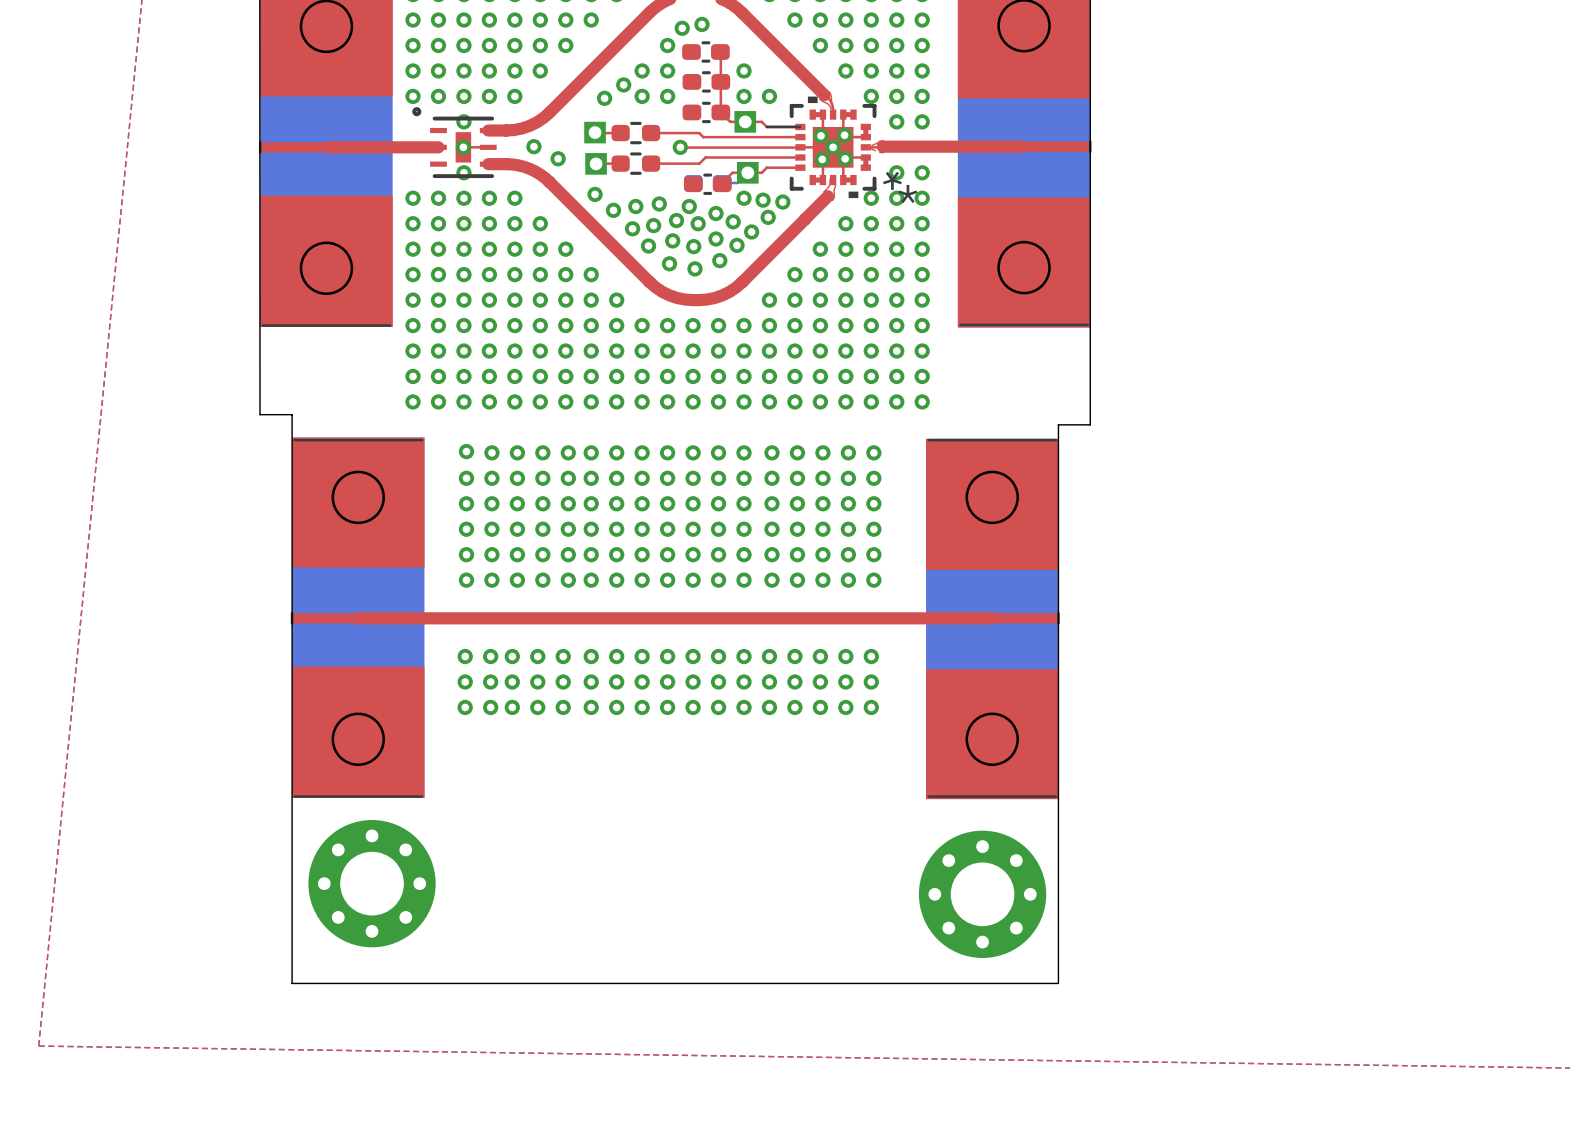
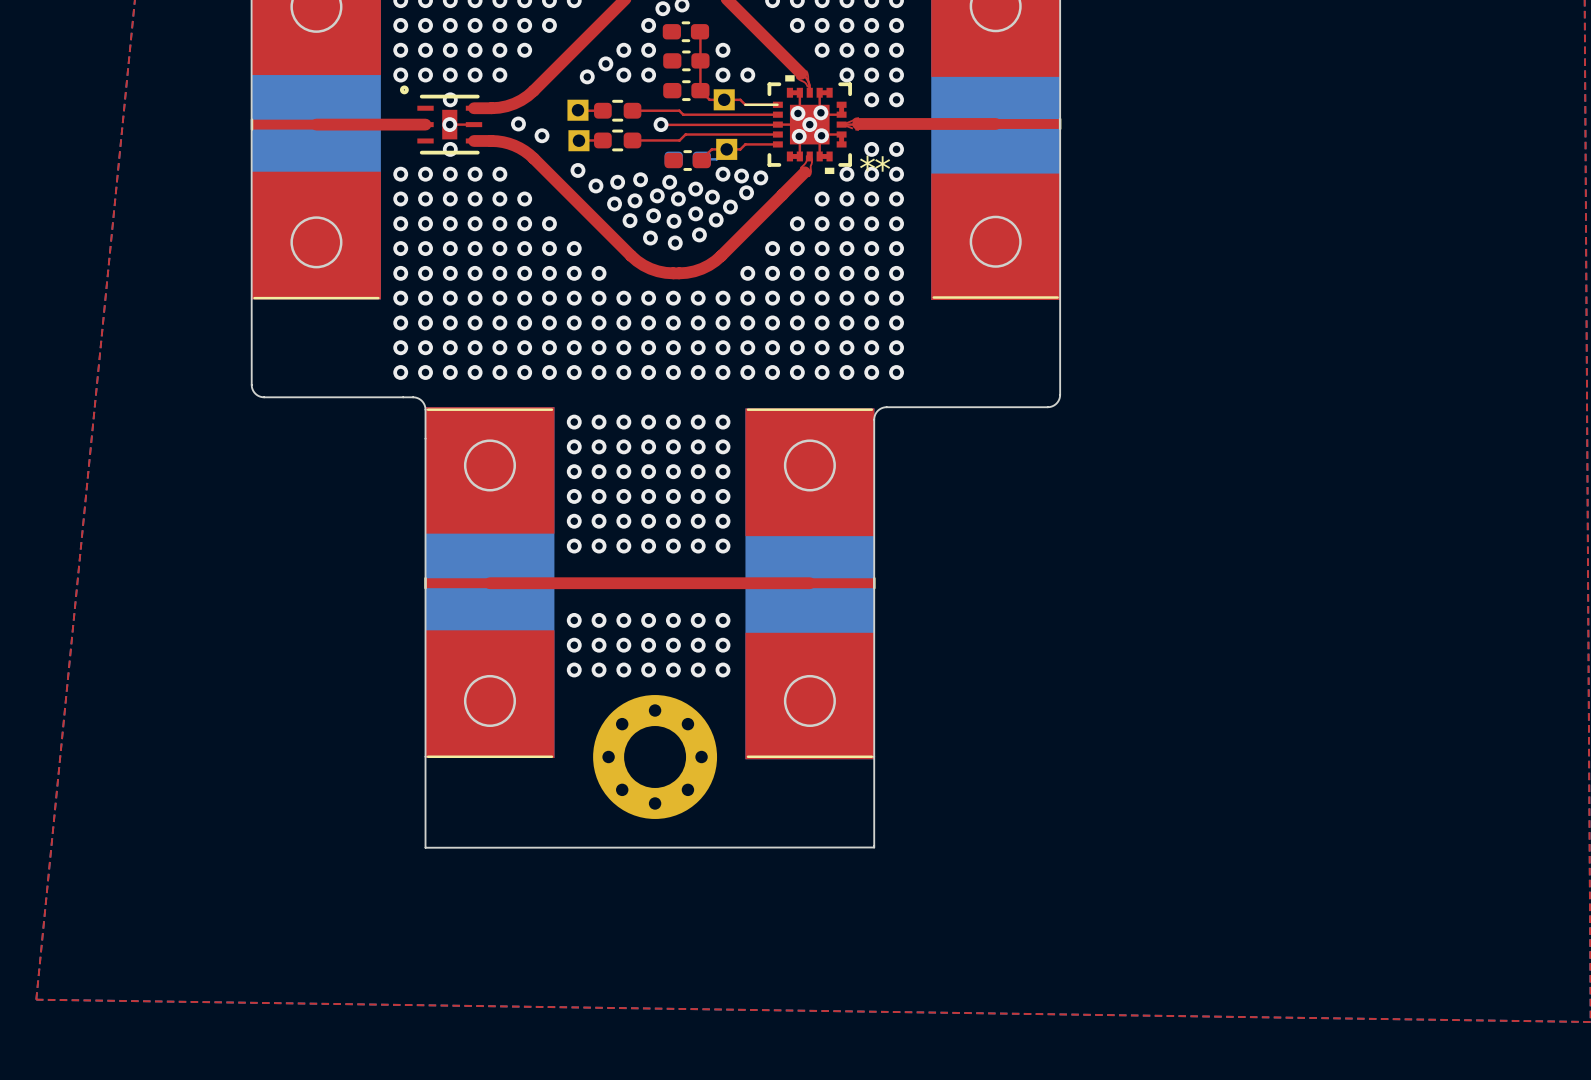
board edge: (259, 414) (292, 414) (292, 983) (1058, 983) (1058, 424) (1090, 424) -> (251, 384) (255, 393) (262, 397) (413, 397) (420, 399) (424, 404) (425, 847) (874, 847) (875, 414) (880, 408) (886, 407) (1049, 407) (1056, 403) (1060, 394)
via: (466, 451) -> none
via: (491, 452) -> none
via: (517, 452) -> none
via: (542, 452) -> none
via: (568, 452) -> none
via: (772, 452) -> none
via: (797, 452) -> none
via: (822, 452) -> none
via: (848, 452) -> none
via: (873, 452) -> none
via: (466, 478) -> none
via: (491, 478) -> none
via: (517, 478) -> none
via: (542, 478) -> none
via: (568, 478) -> none
via: (772, 478) -> none
via: (797, 478) -> none
via: (822, 478) -> none
via: (848, 478) -> none
via: (873, 478) -> none
via: (466, 503) -> none
via: (491, 503) -> none
via: (517, 503) -> none
via: (542, 503) -> none
via: (568, 503) -> none
via: (772, 503) -> none
via: (797, 503) -> none
via: (822, 503) -> none
via: (848, 503) -> none
via: (873, 503) -> none
via: (466, 529) -> none
via: (491, 529) -> none
via: (517, 529) -> none
via: (542, 529) -> none
via: (568, 529) -> none
via: (772, 529) -> none
via: (797, 529) -> none
via: (822, 529) -> none
via: (848, 529) -> none
via: (873, 529) -> none
via: (466, 554) -> none
via: (491, 554) -> none
via: (517, 554) -> none
via: (542, 554) -> none
via: (568, 554) -> none
via: (772, 554) -> none
via: (797, 554) -> none
via: (822, 554) -> none
via: (848, 554) -> none
via: (873, 554) -> none
via: (466, 580) -> none
via: (491, 580) -> none
via: (517, 580) -> none
via: (542, 580) -> none
via: (568, 580) -> none
via: (772, 580) -> none
via: (797, 580) -> none
via: (822, 580) -> none
via: (848, 580) -> none
via: (873, 580) -> none
part position: (357, 617) -> (489, 582)
top track: (358, 618) (504, 618) -> none
top track: (833, 618) (992, 618) -> none
part position: (992, 618) -> (810, 583)
via: (465, 656) -> none
via: (490, 656) -> none
via: (512, 656) -> none
via: (537, 656) -> none
via: (563, 656) -> none
via: (769, 656) -> none
via: (794, 656) -> none
via: (820, 656) -> none
via: (845, 656) -> none
via: (871, 656) -> none
via: (465, 681) -> none
via: (490, 681) -> none
via: (512, 681) -> none
via: (537, 681) -> none
via: (563, 681) -> none
via: (769, 681) -> none
via: (794, 681) -> none
via: (820, 681) -> none
via: (845, 681) -> none
via: (871, 681) -> none
via: (465, 707) -> none
via: (490, 707) -> none
via: (512, 707) -> none
via: (537, 707) -> none
via: (563, 707) -> none
via: (769, 707) -> none
via: (794, 707) -> none
via: (820, 707) -> none
via: (845, 707) -> none
via: (871, 707) -> none
part: none -> (655, 757)
part: (372, 883) -> none
part: (982, 894) -> none

